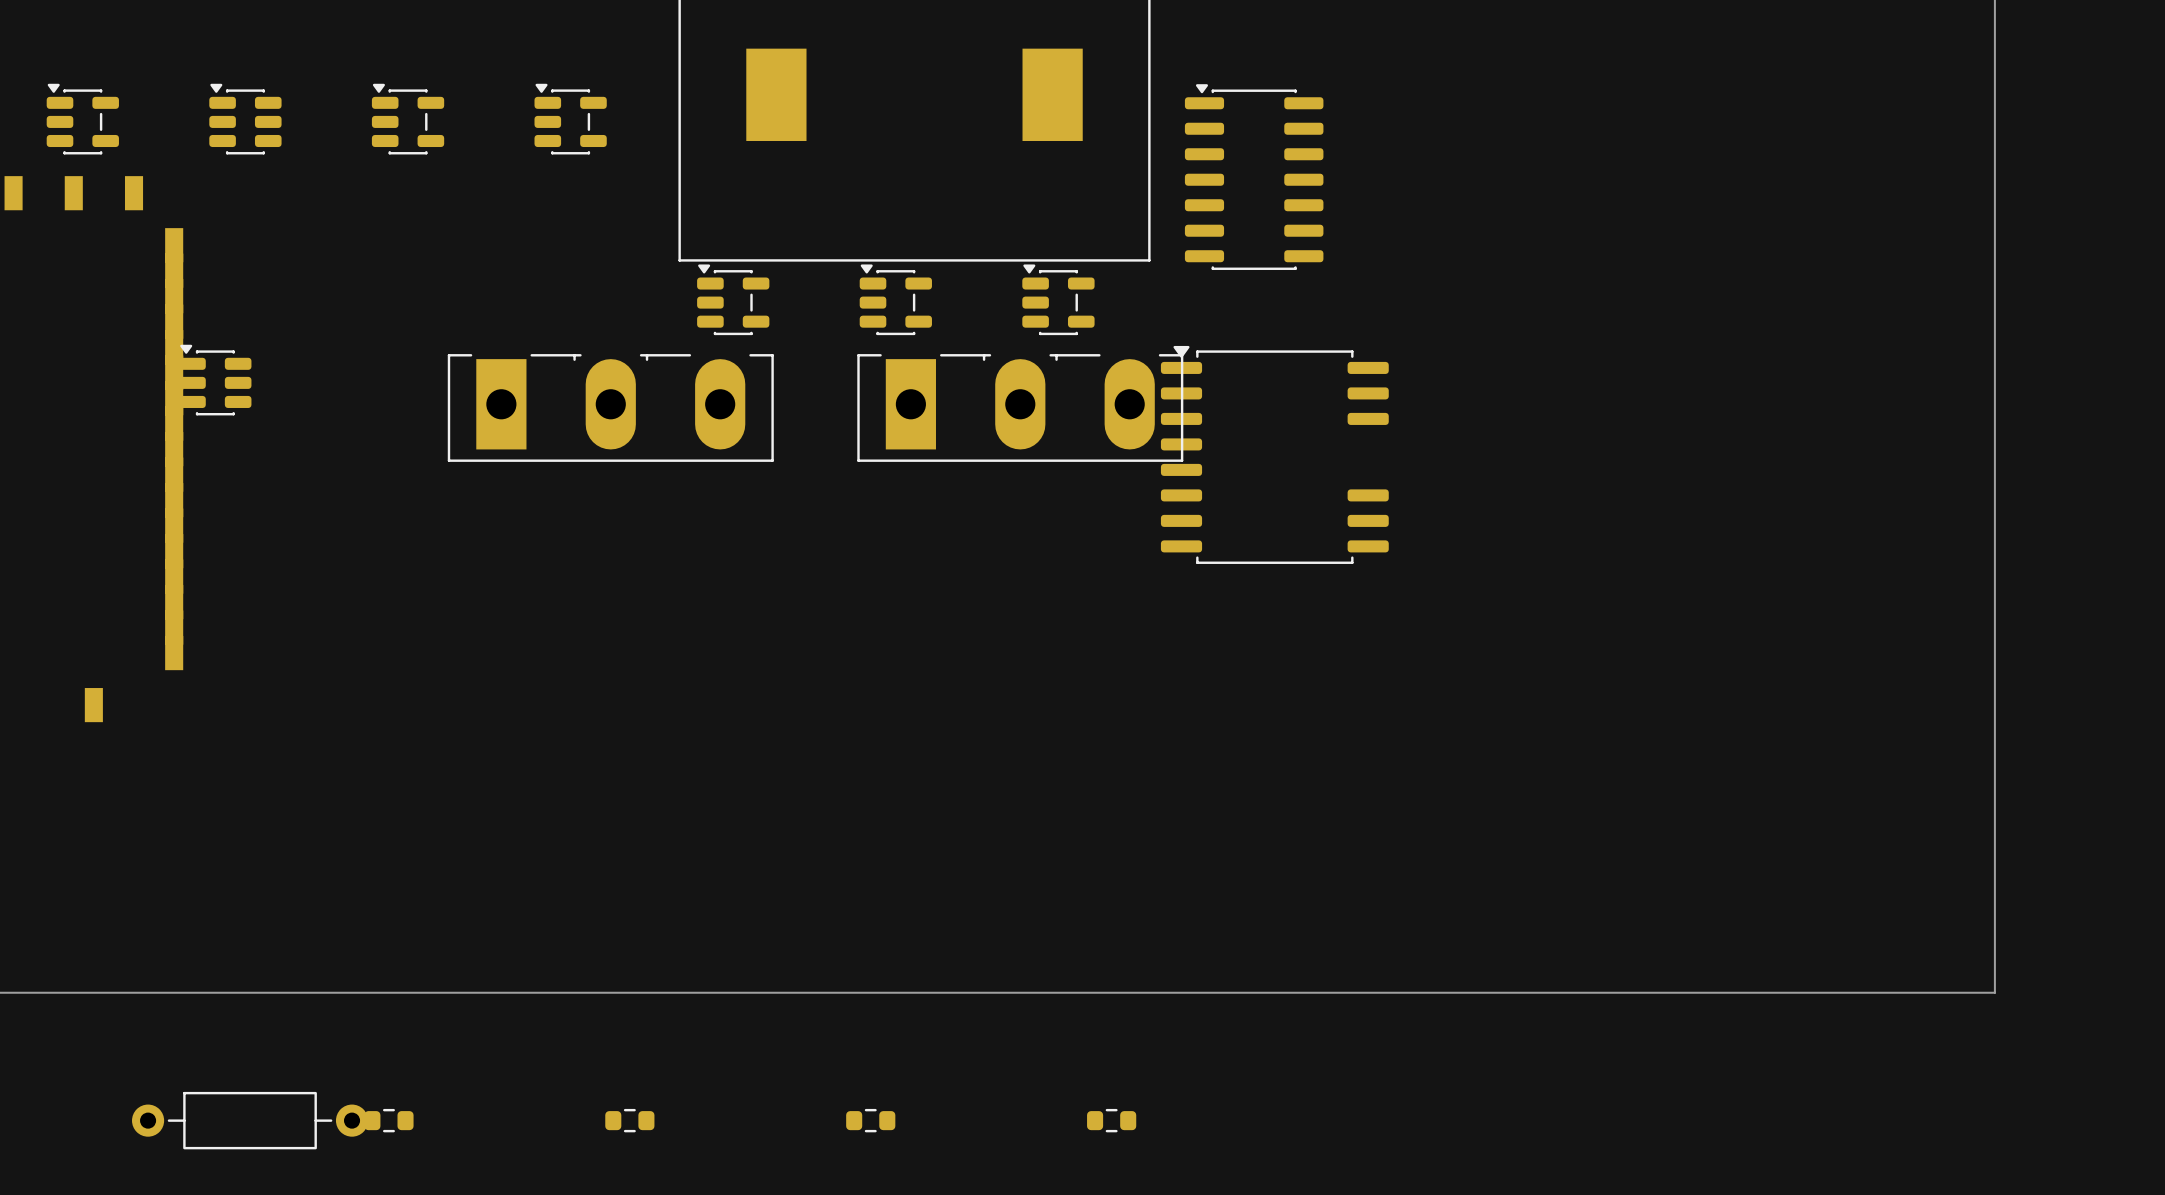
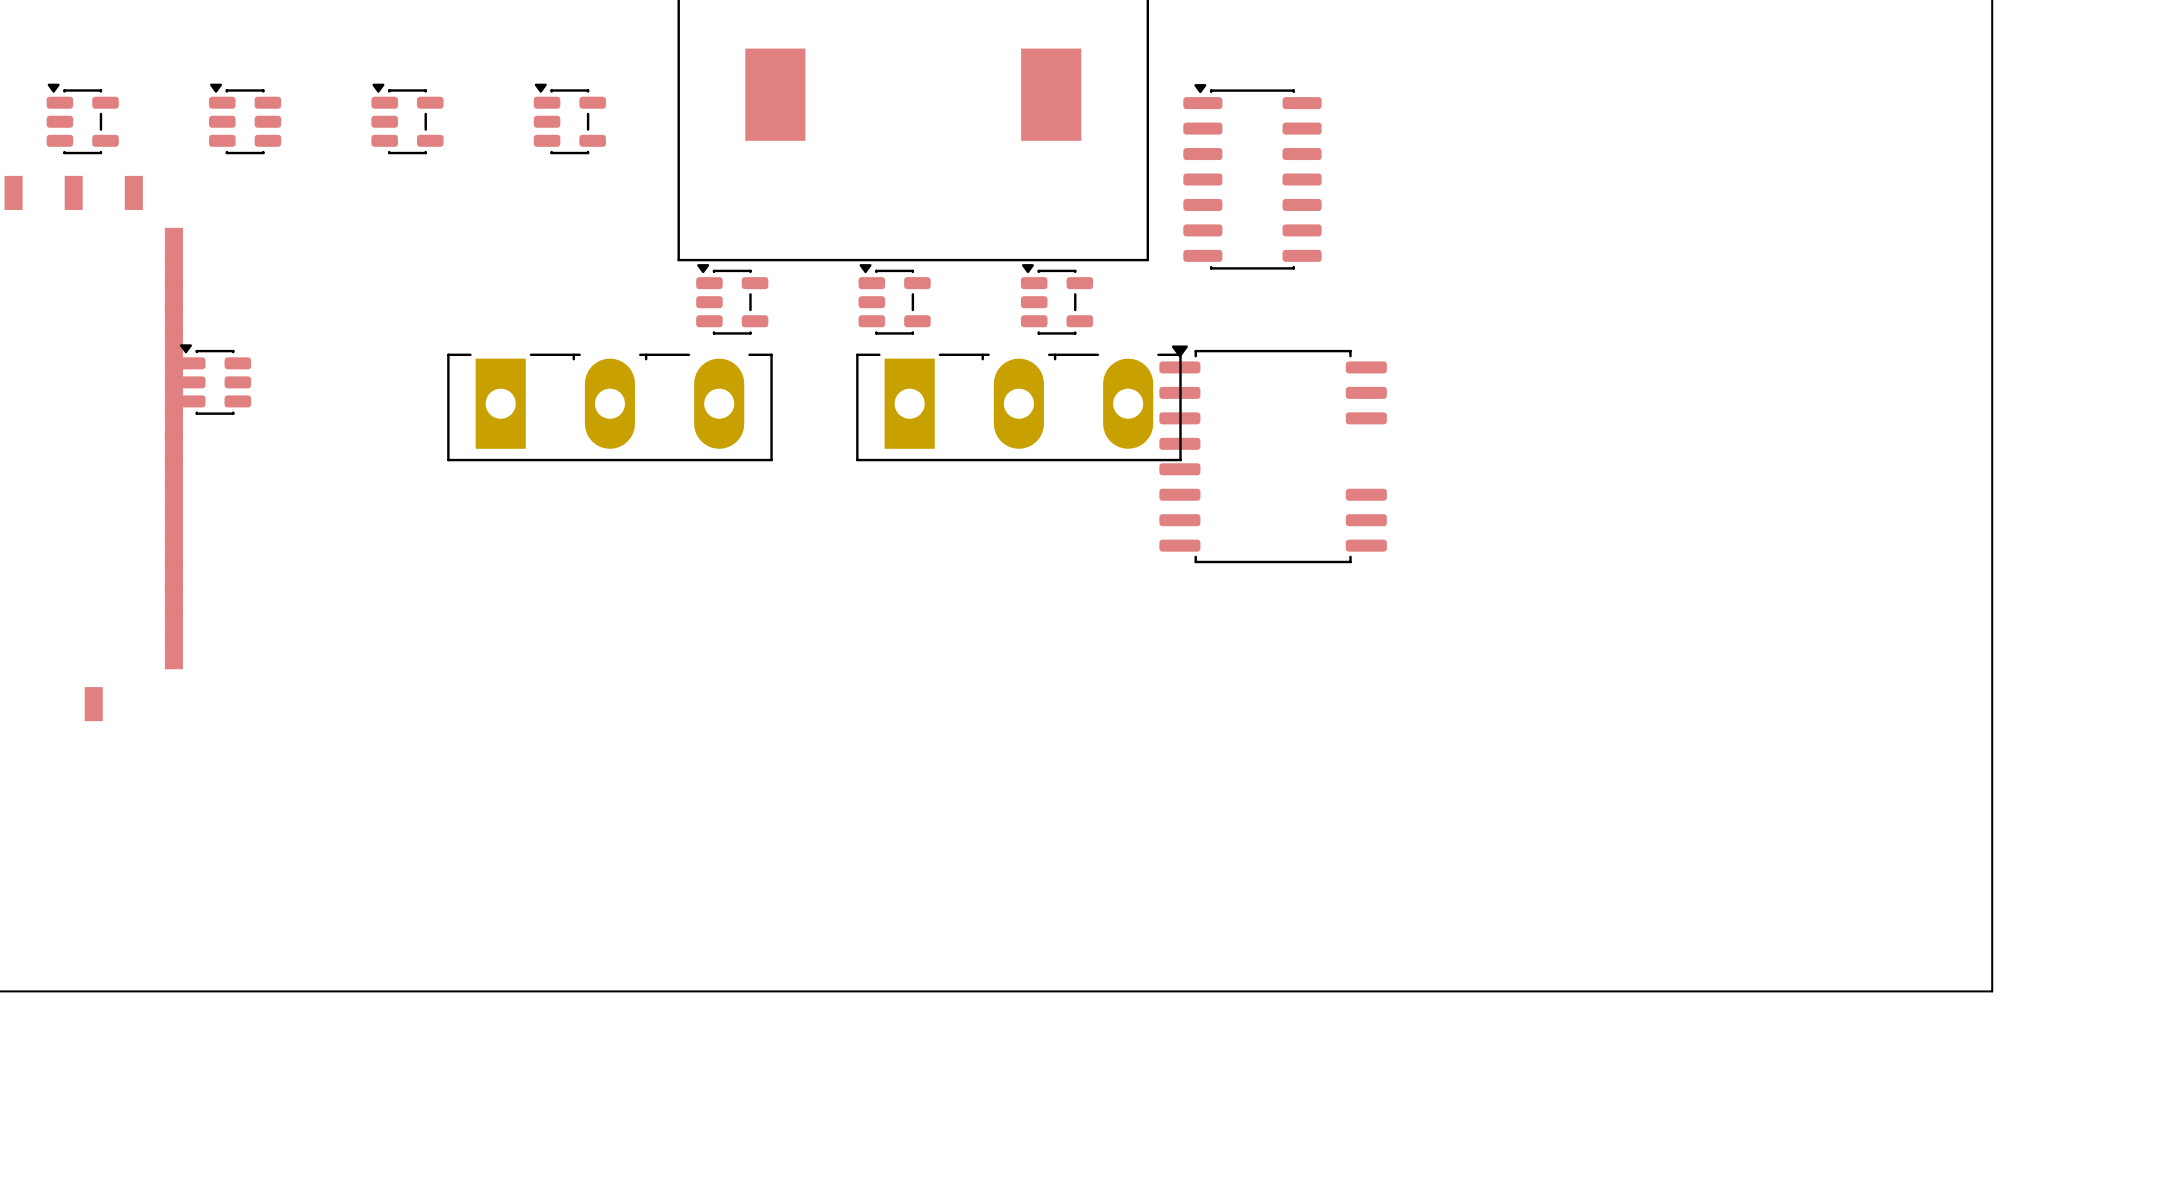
part: (250, 1120) -> none
part: (388, 1120) -> none
part: (629, 1120) -> none
part: (870, 1120) -> none
part: (1111, 1120) -> none

